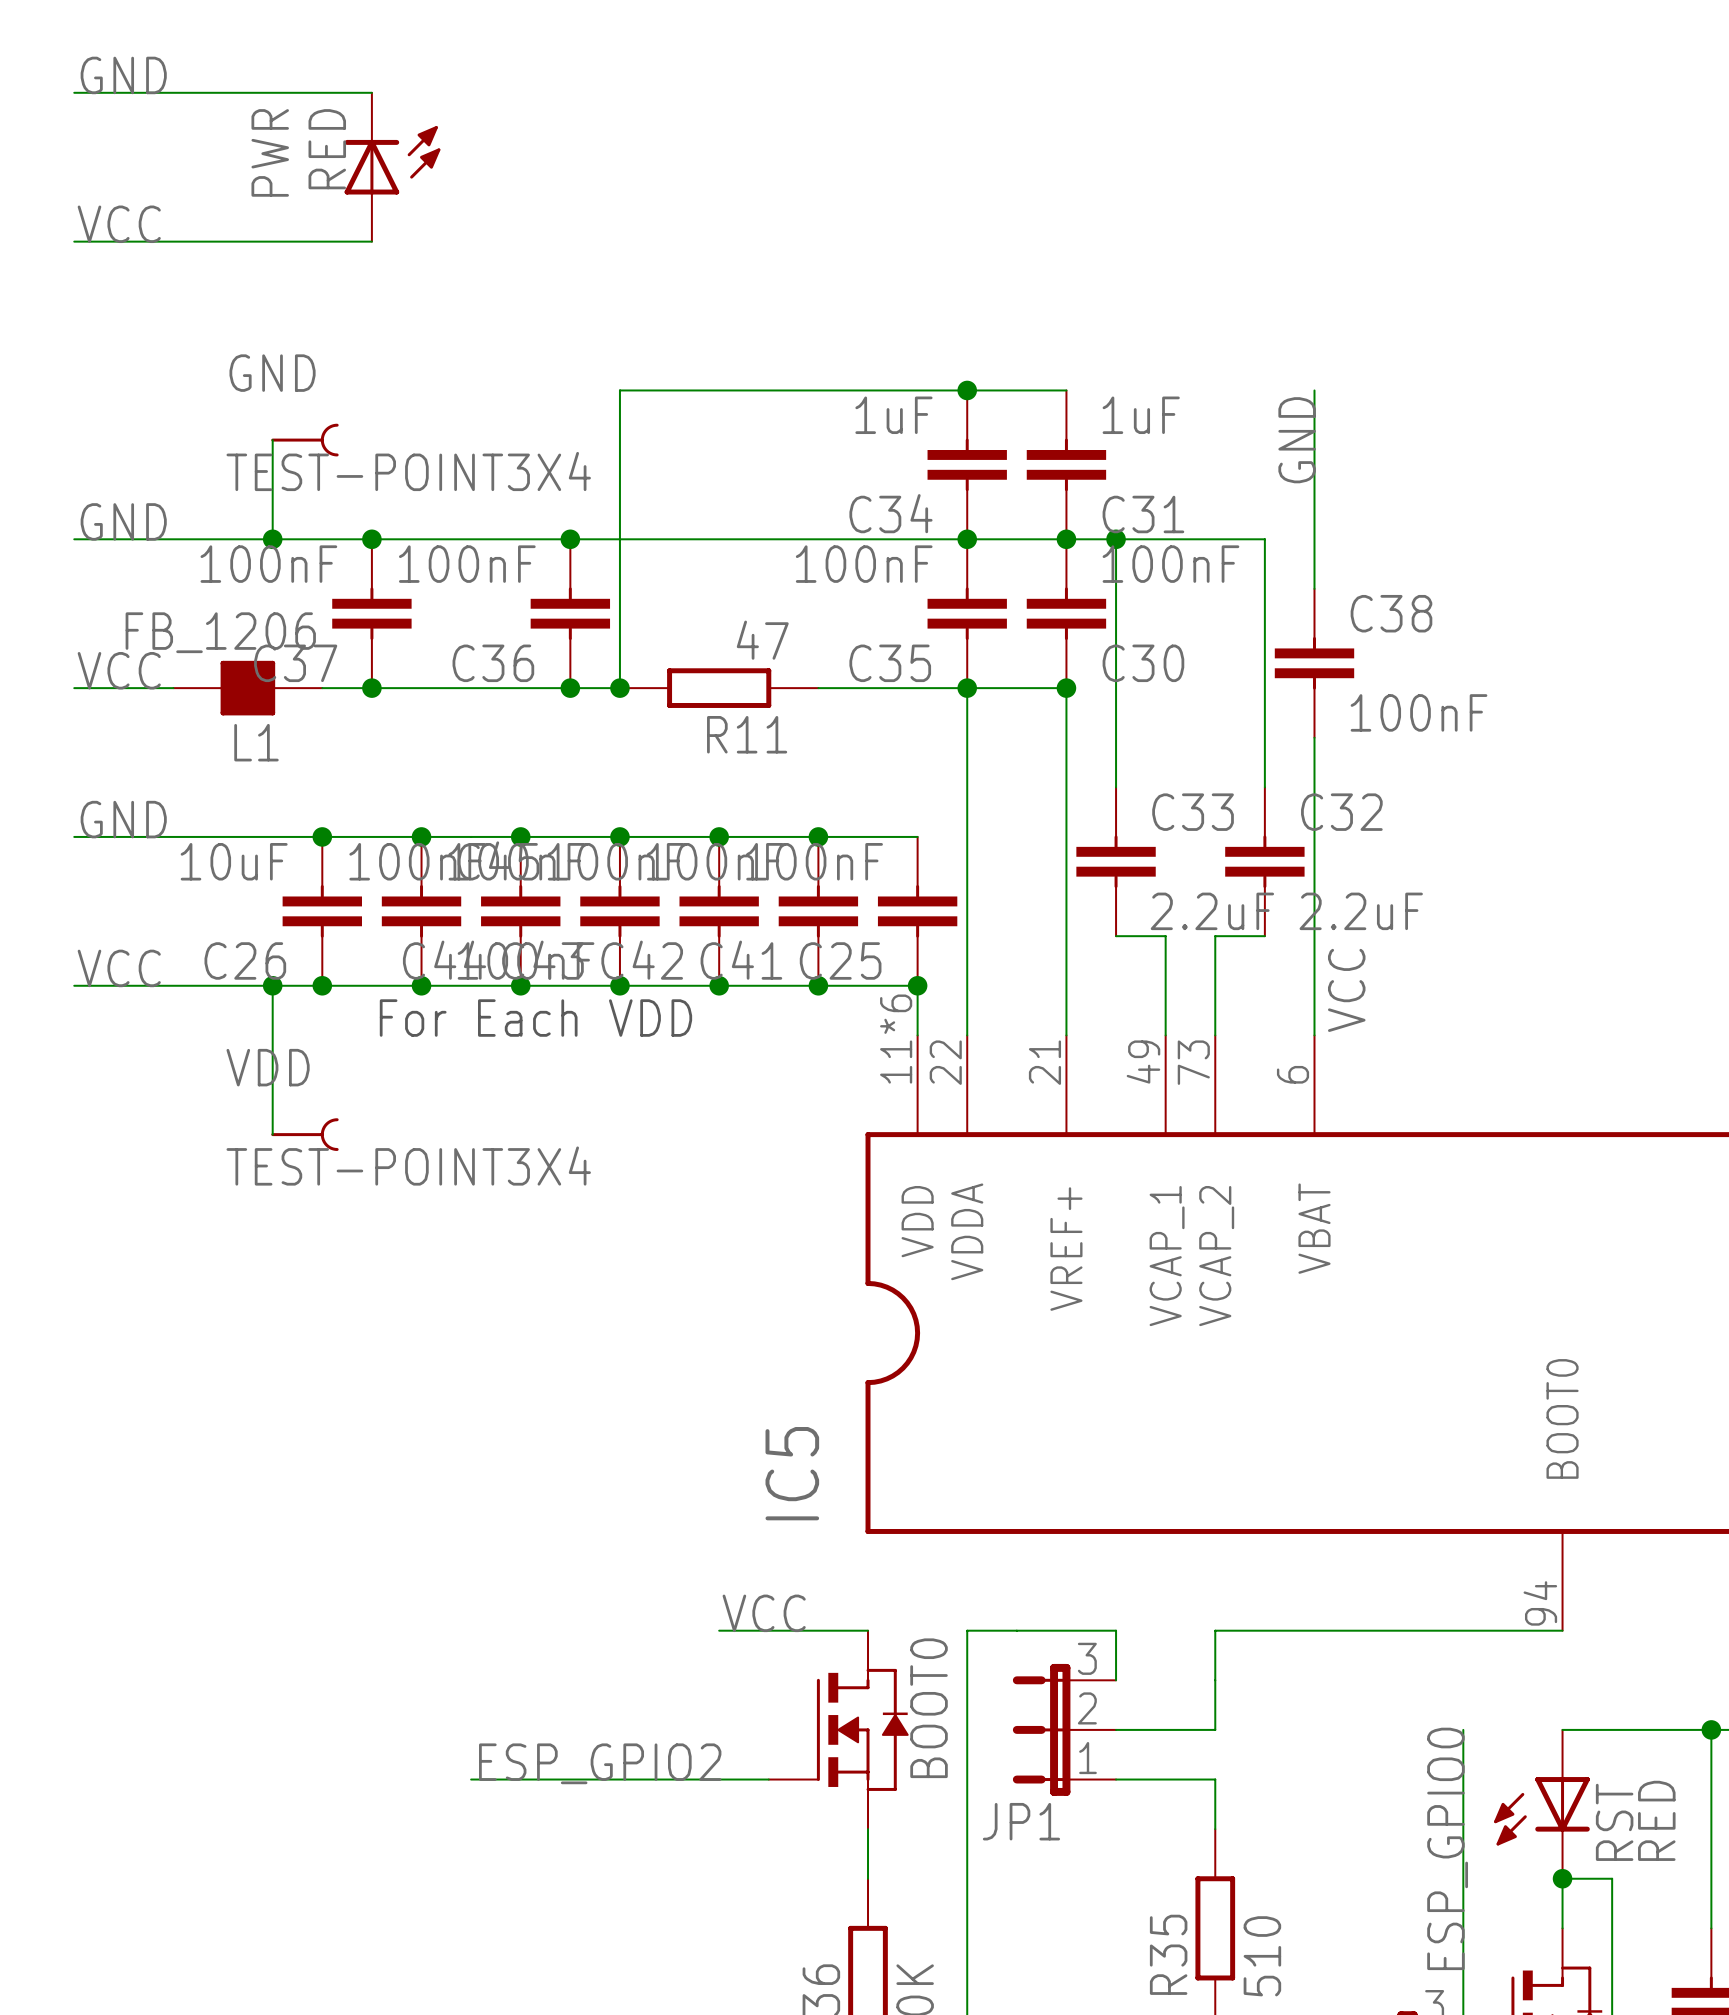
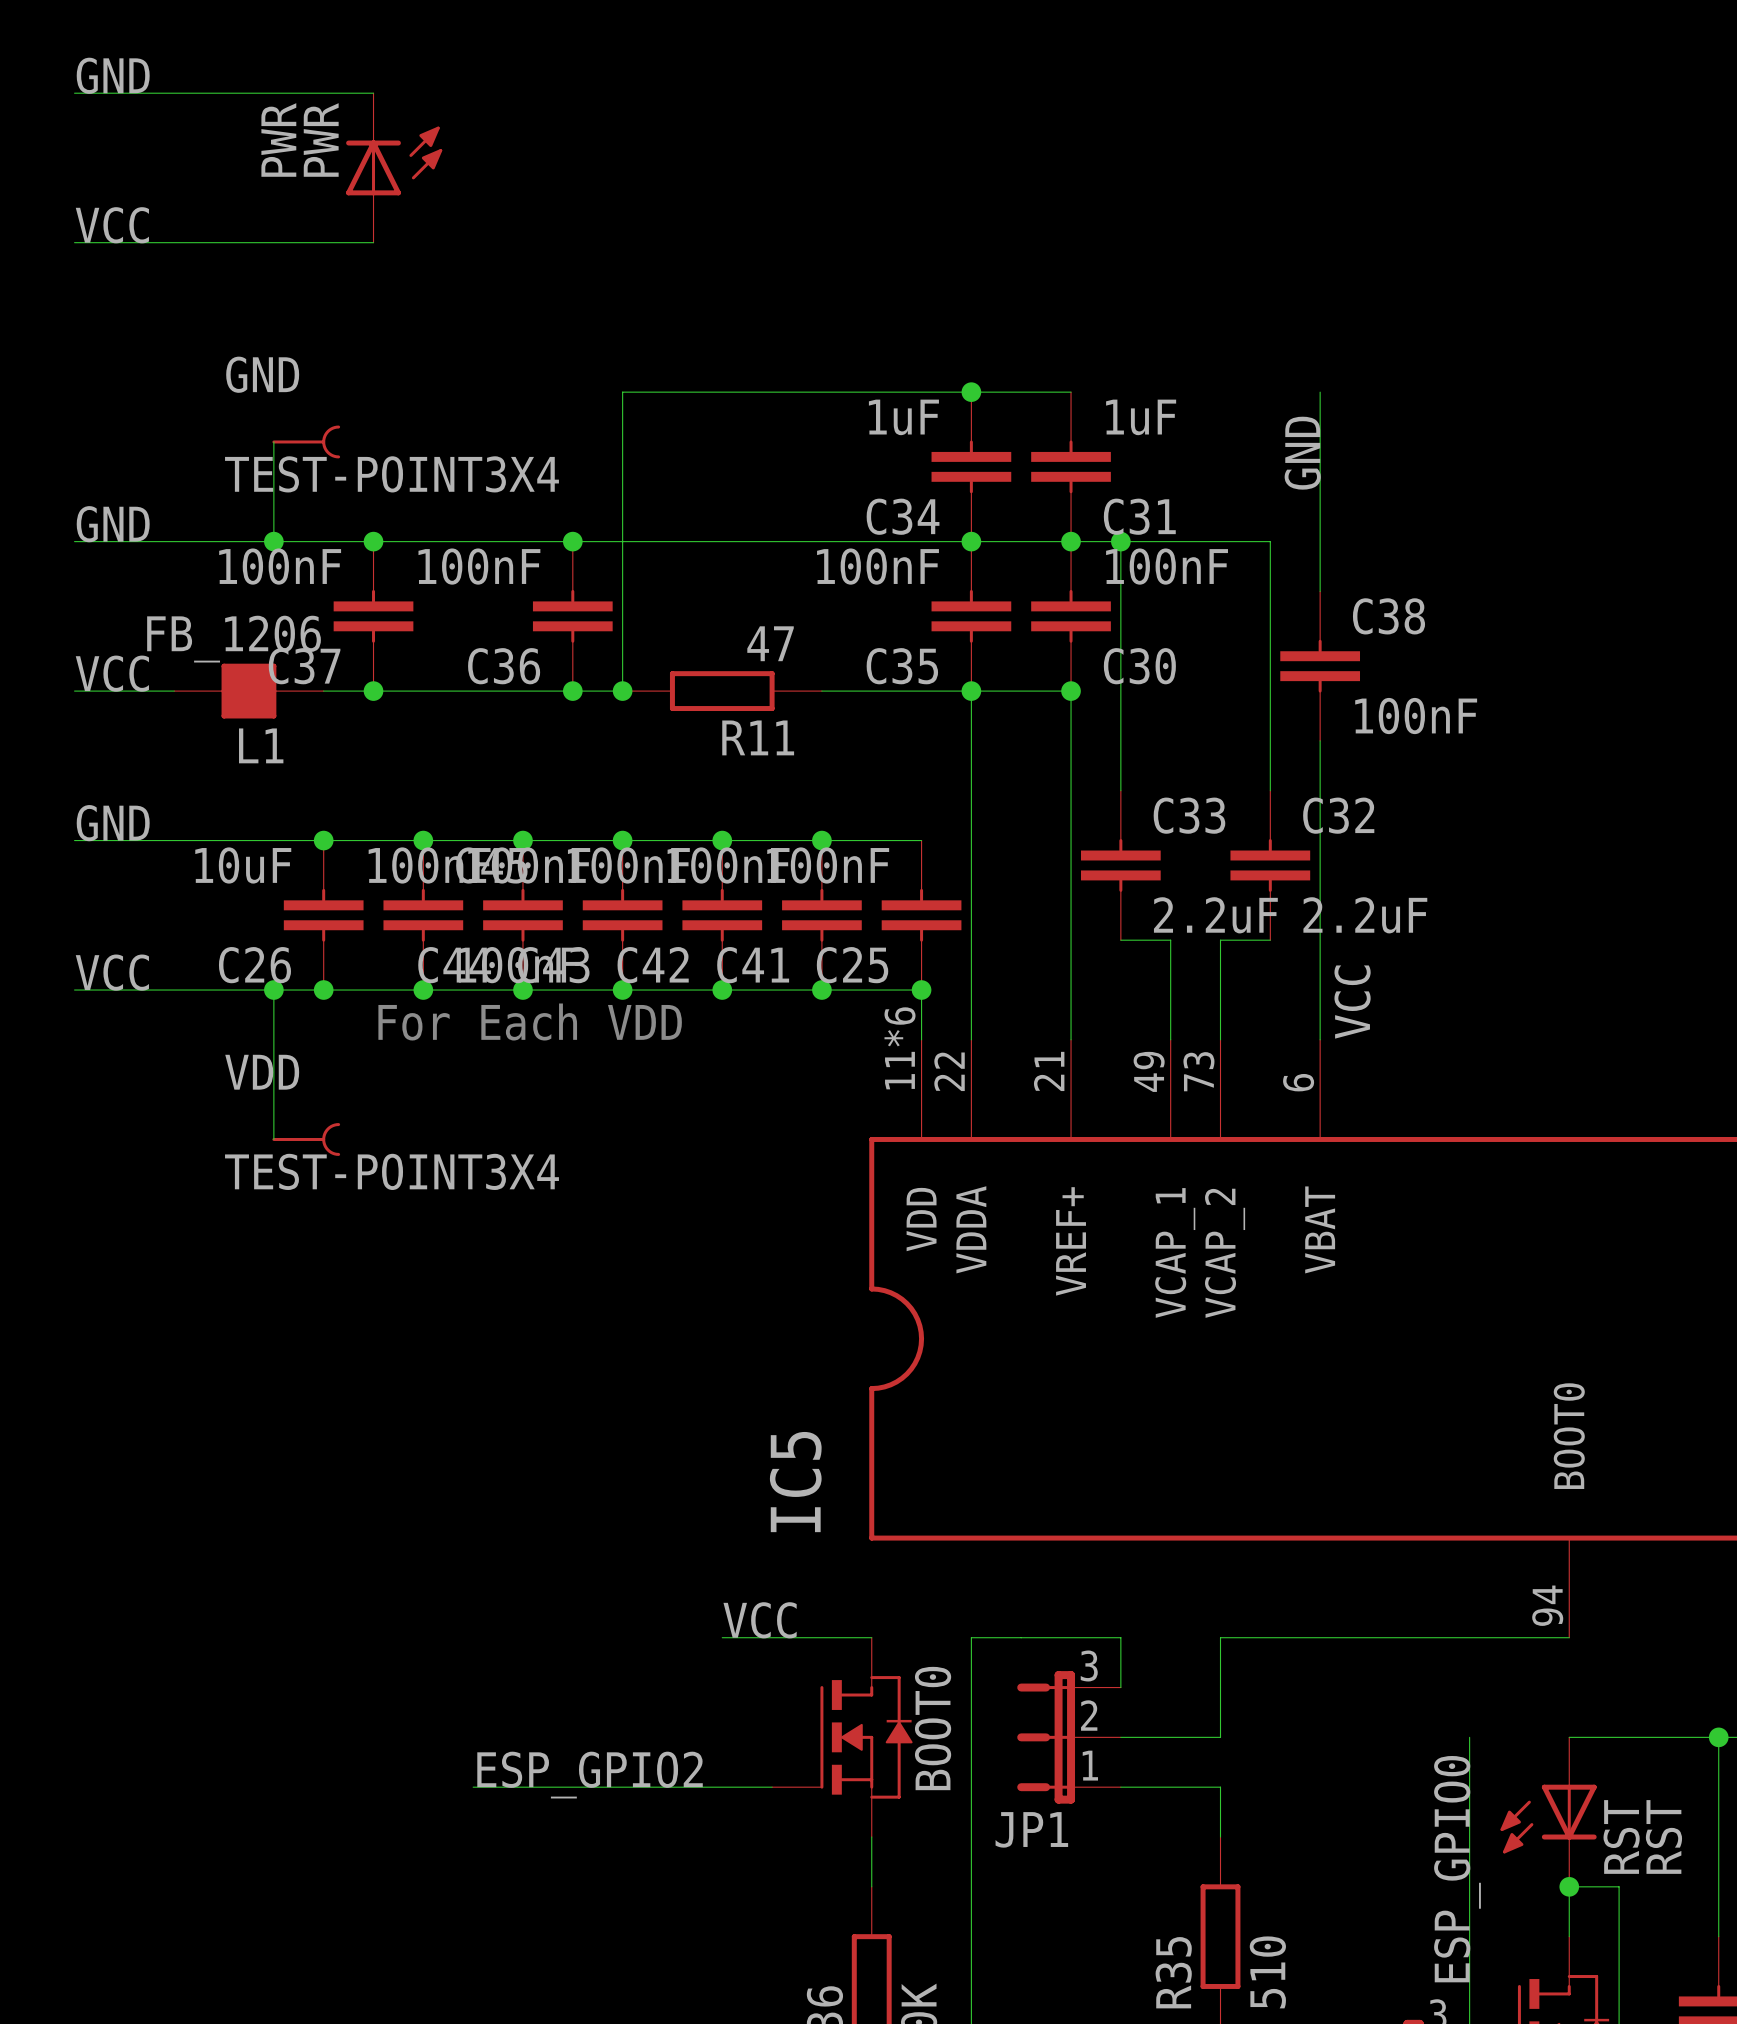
PWR value: RED (327, 149) -> PWR (278, 139)
PWR name position: PWR (270, 152) -> PWR (321, 139)
RST value: RED (1656, 1820) -> RST (1663, 1836)

